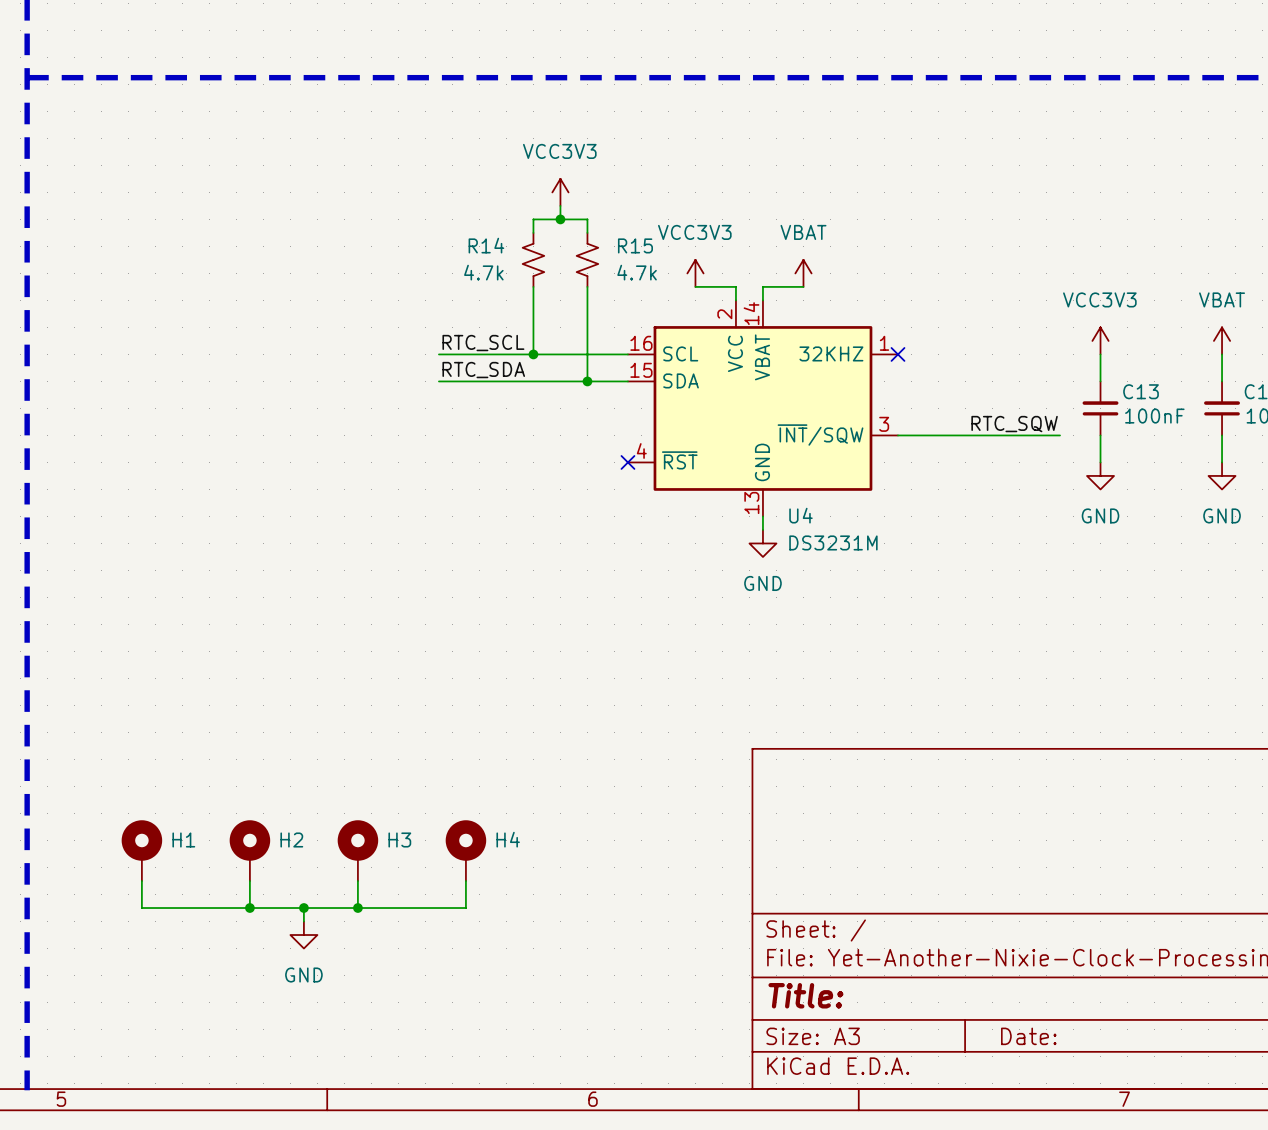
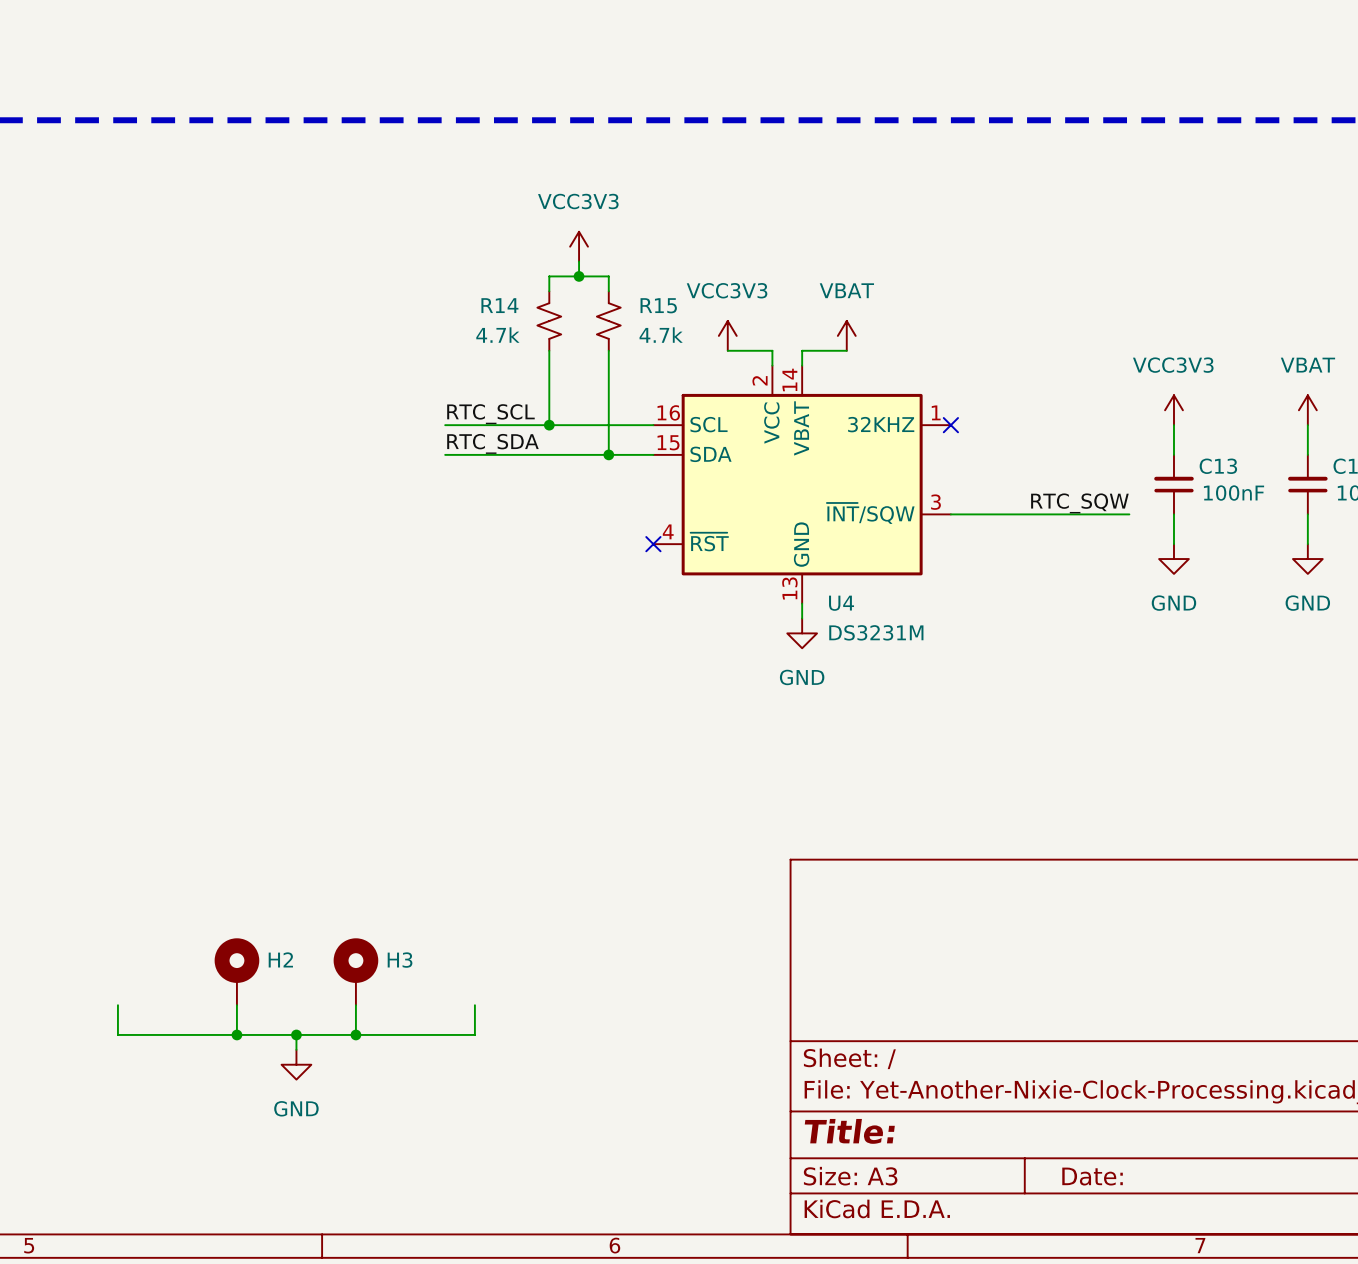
H1: (141, 850) -> none
H4: (465, 850) -> none

